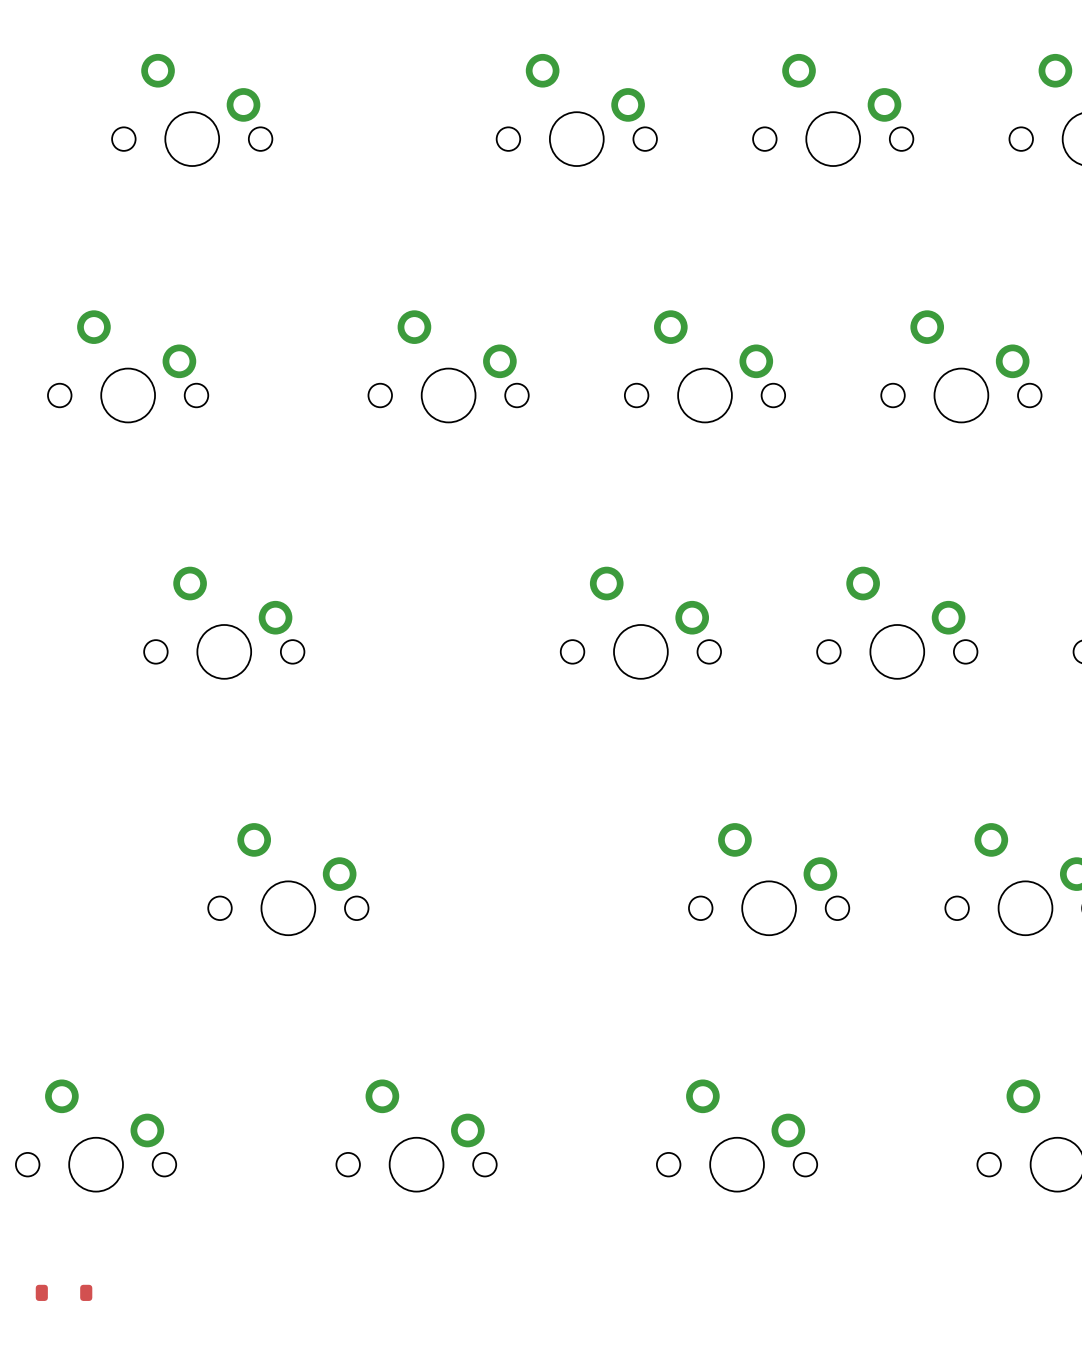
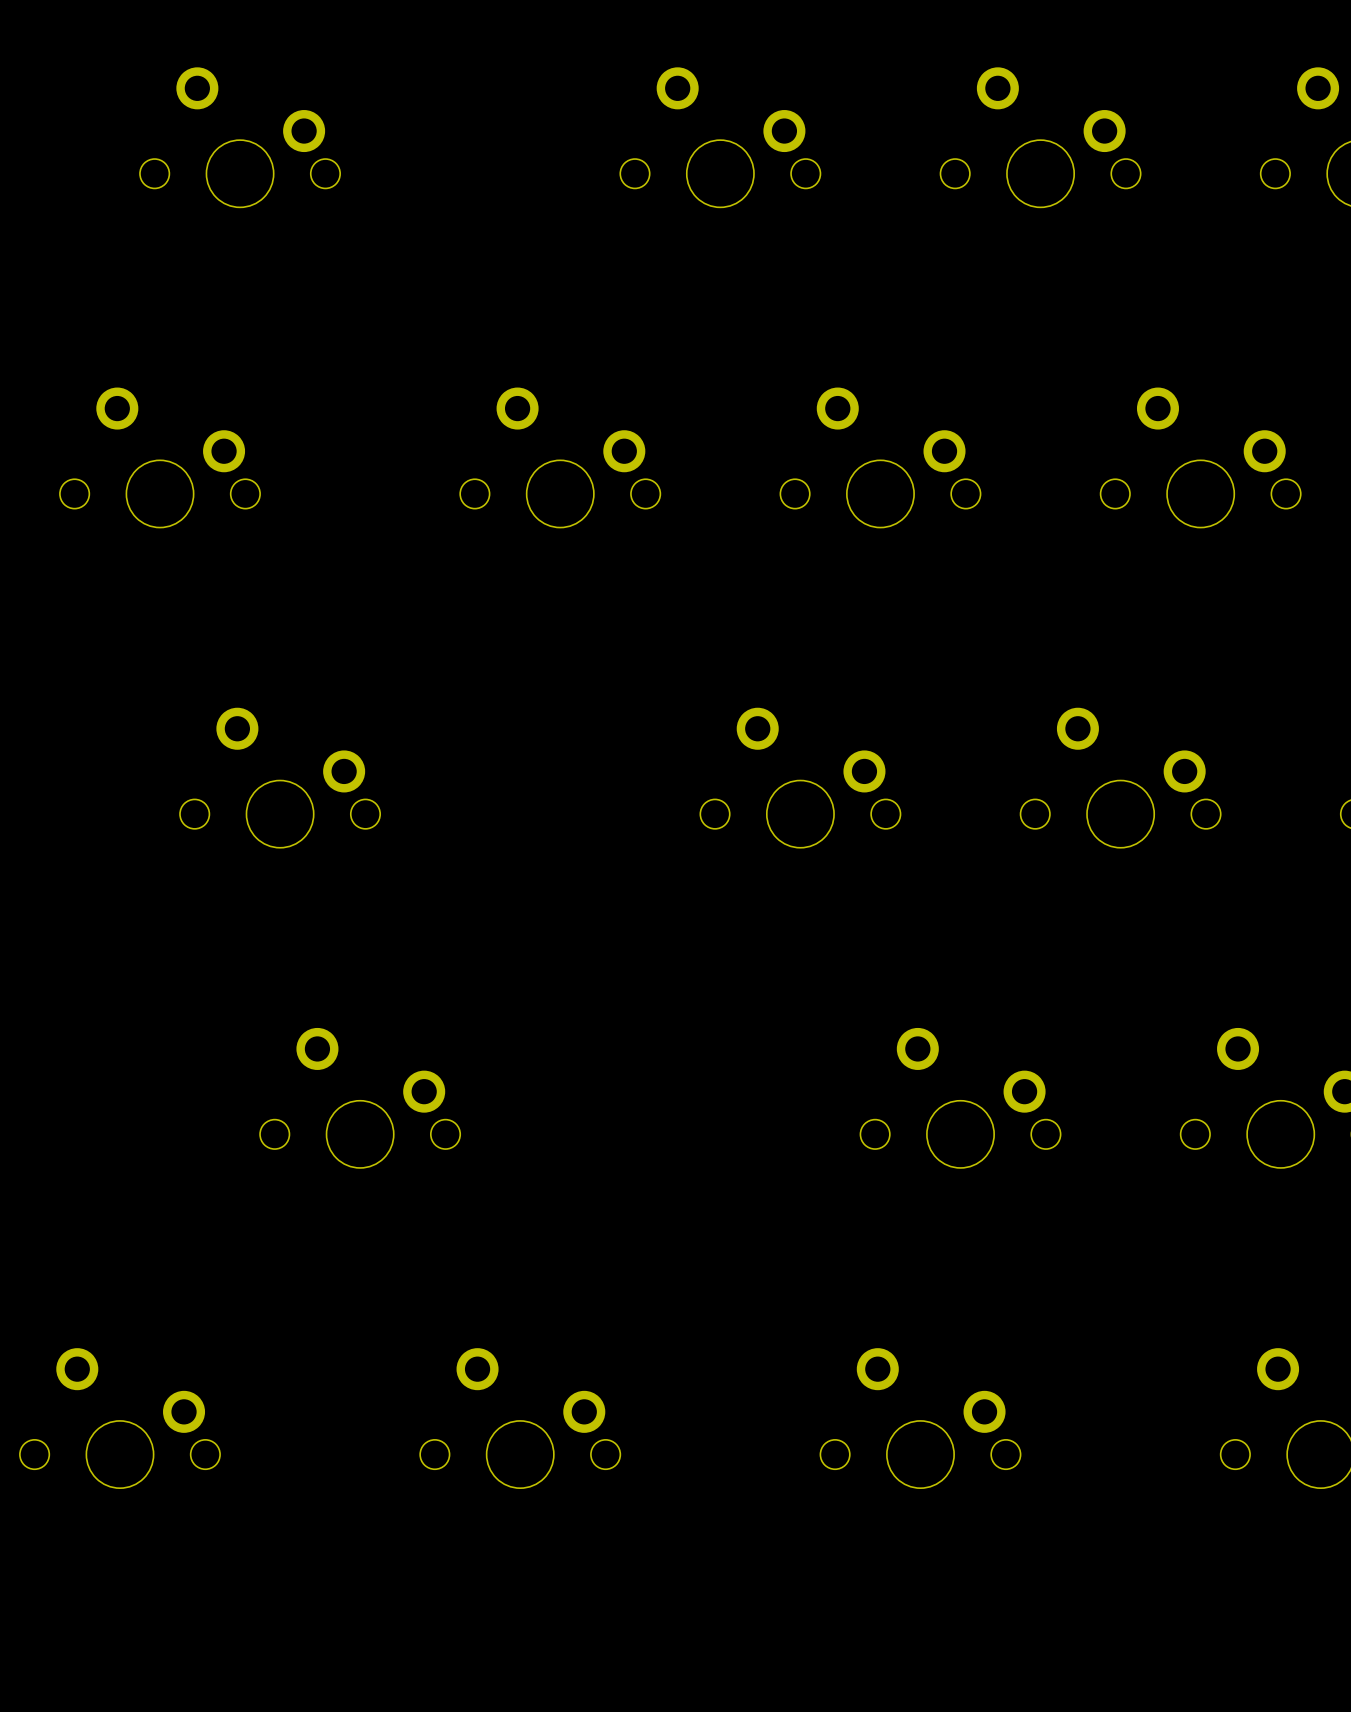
part: (64, 1292) -> none

